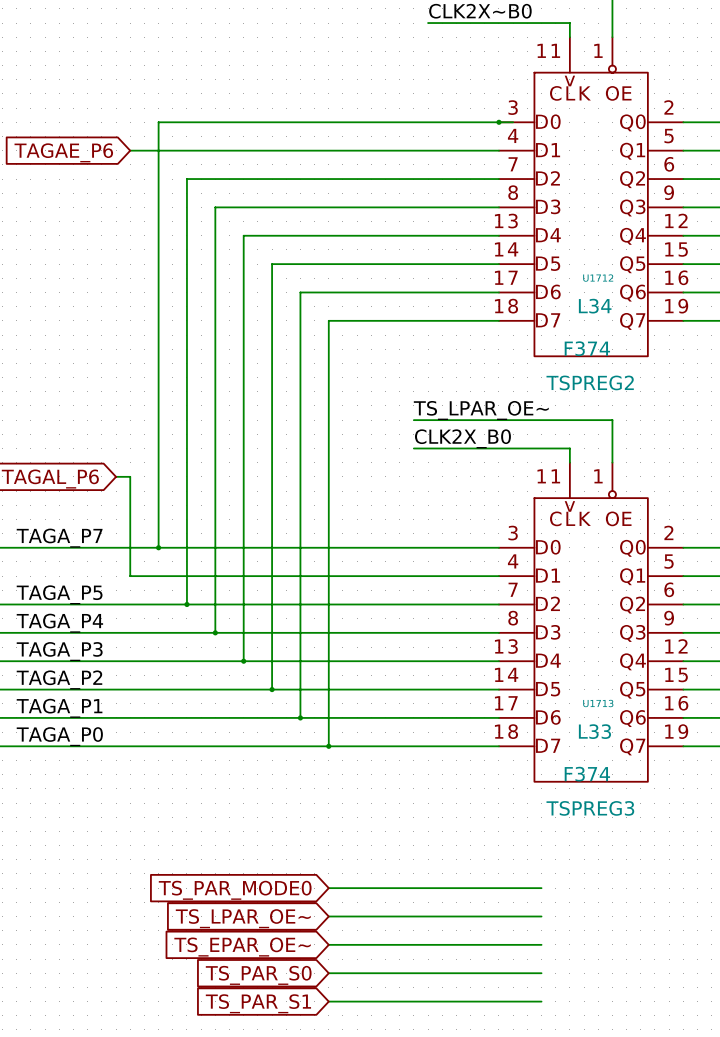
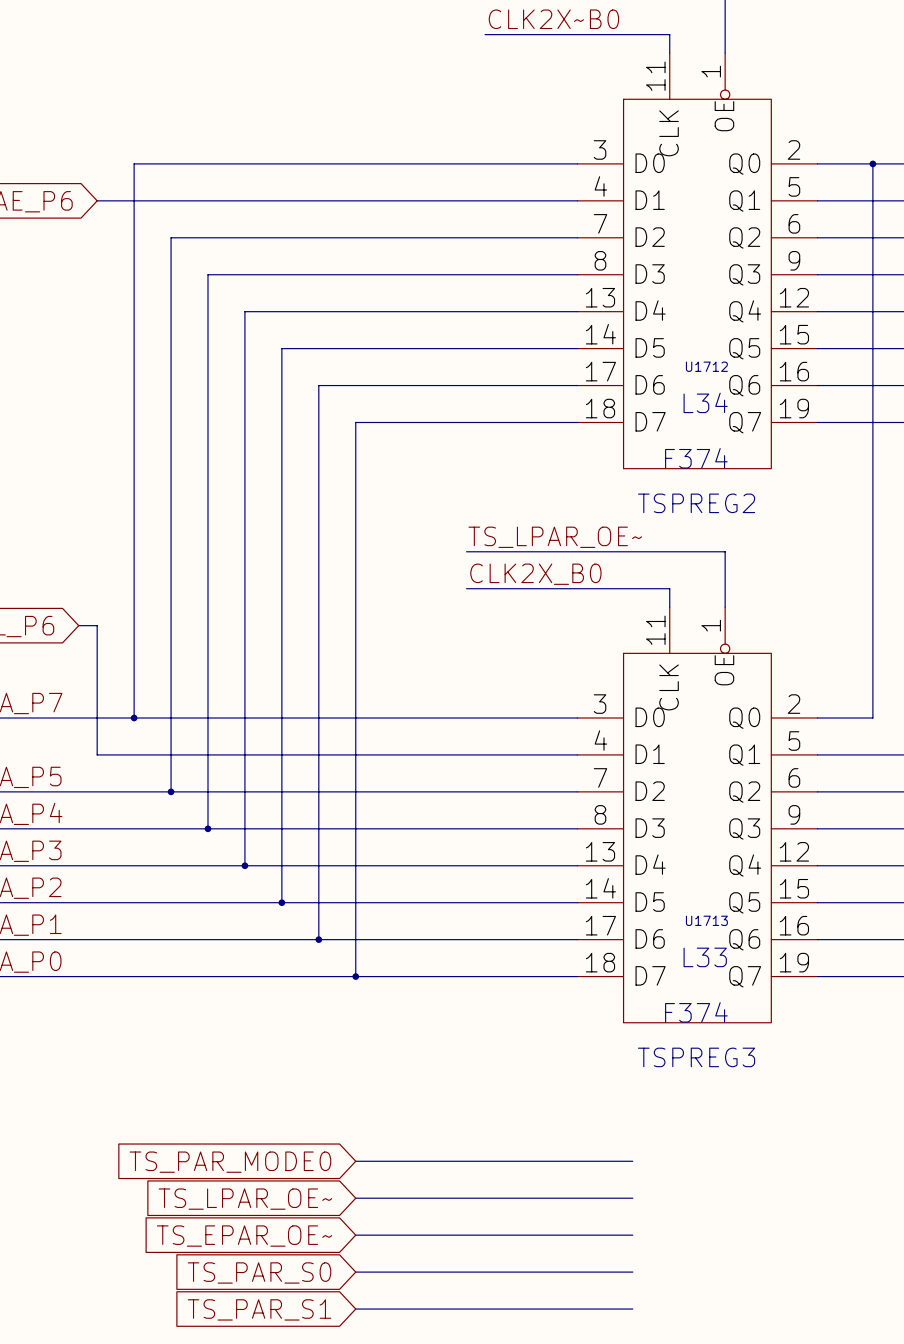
U1712 symbol: [498, 37, 684, 357] -> [577, 53, 818, 469]
junction: (498, 122) -> none
U1713 symbol: [498, 462, 684, 782] -> [577, 607, 818, 1023]

